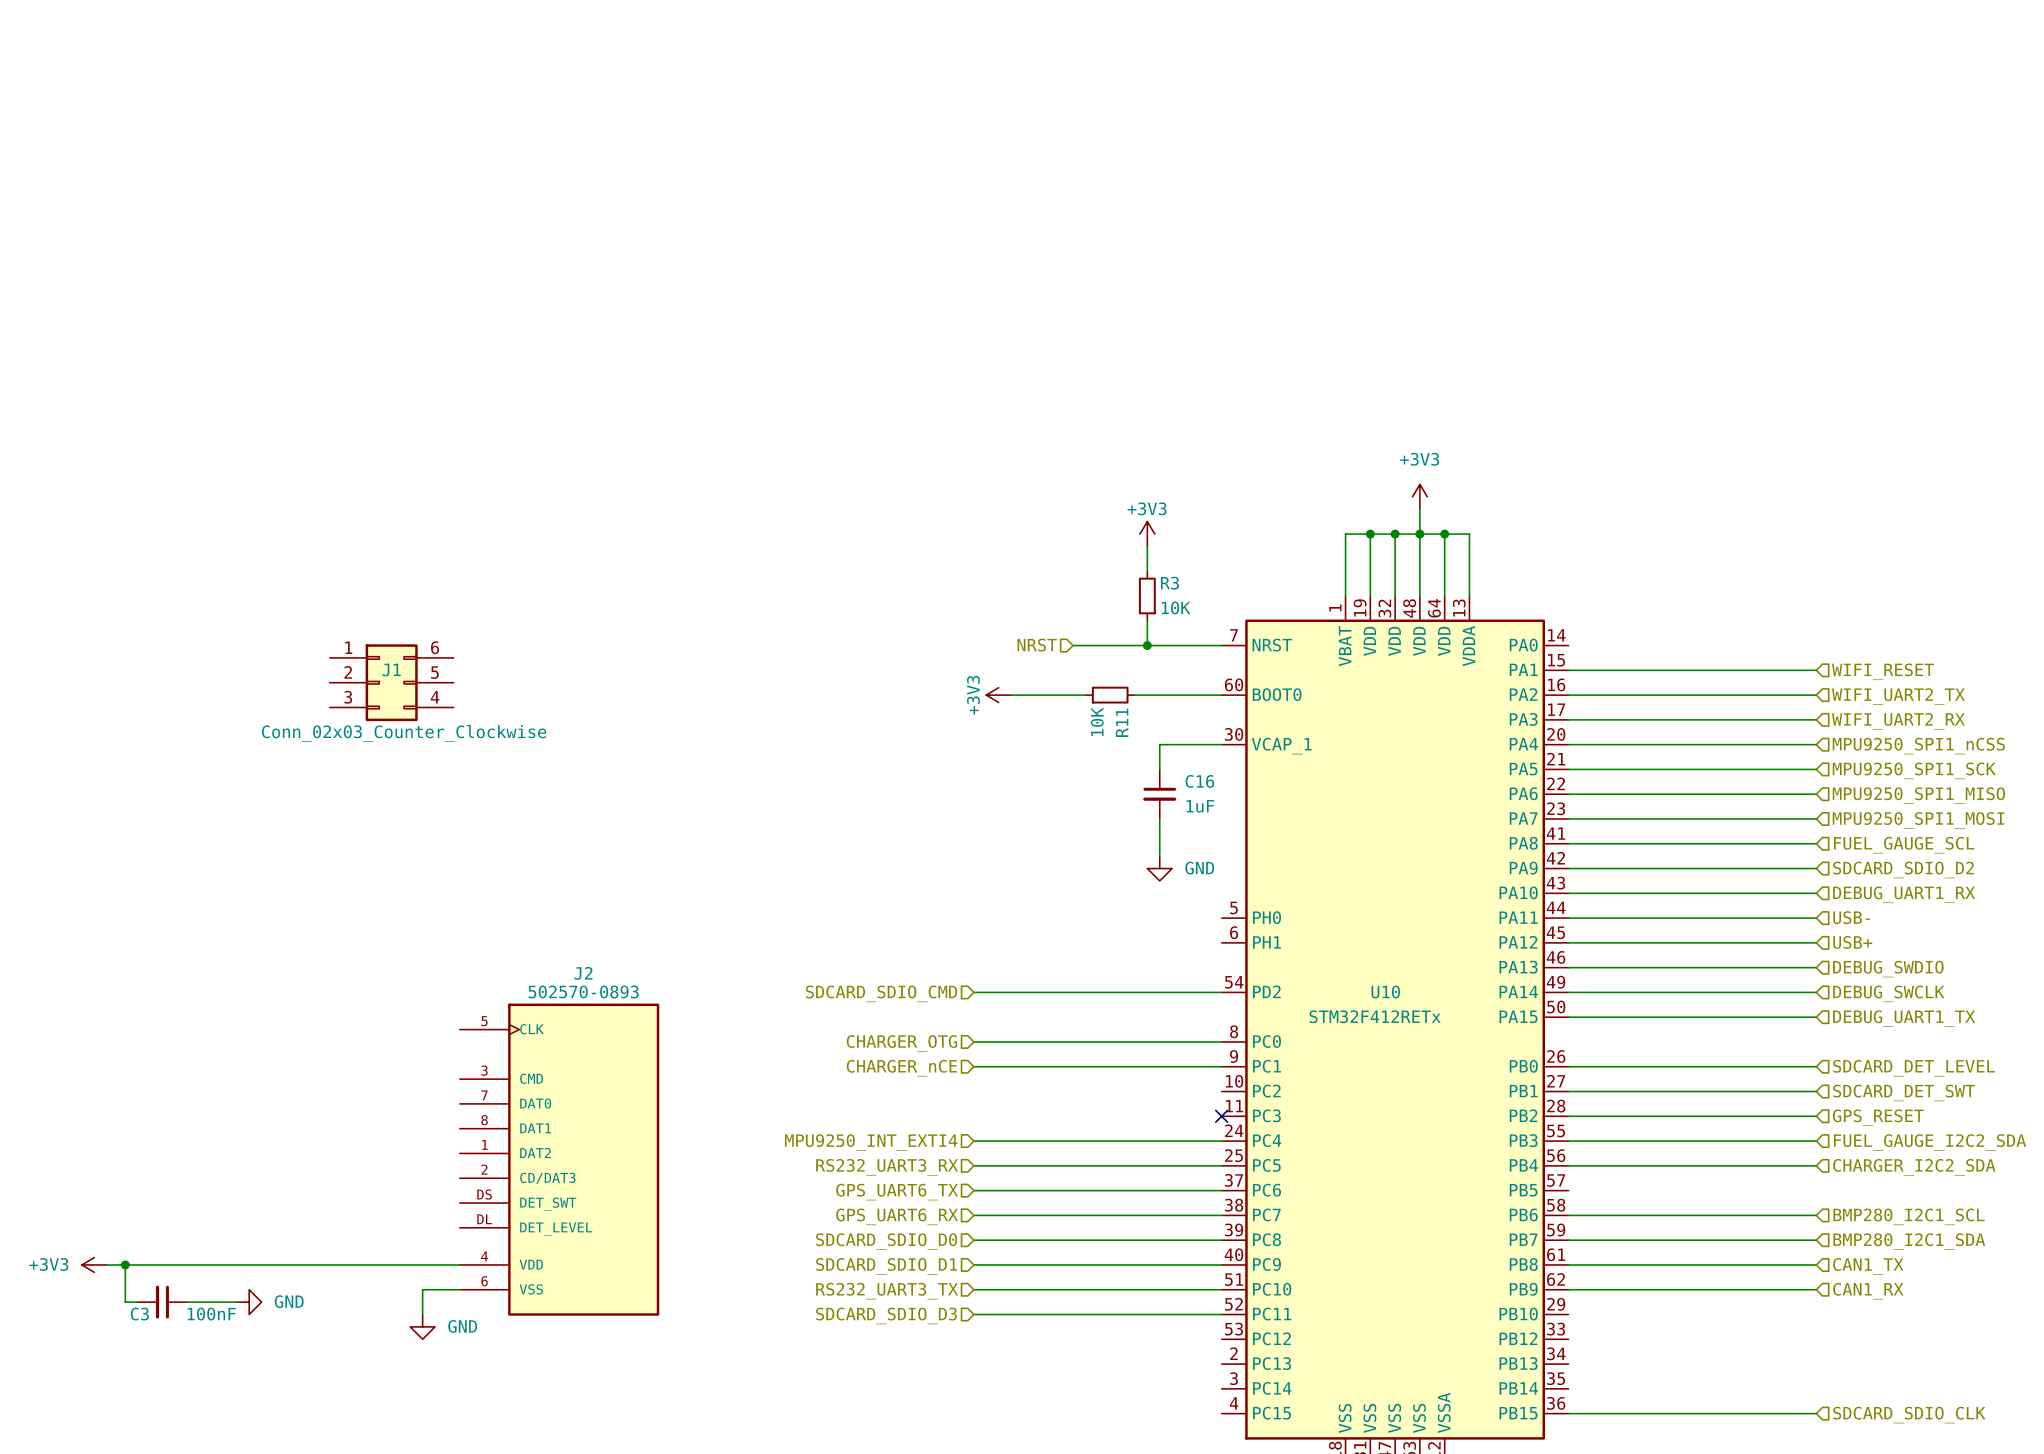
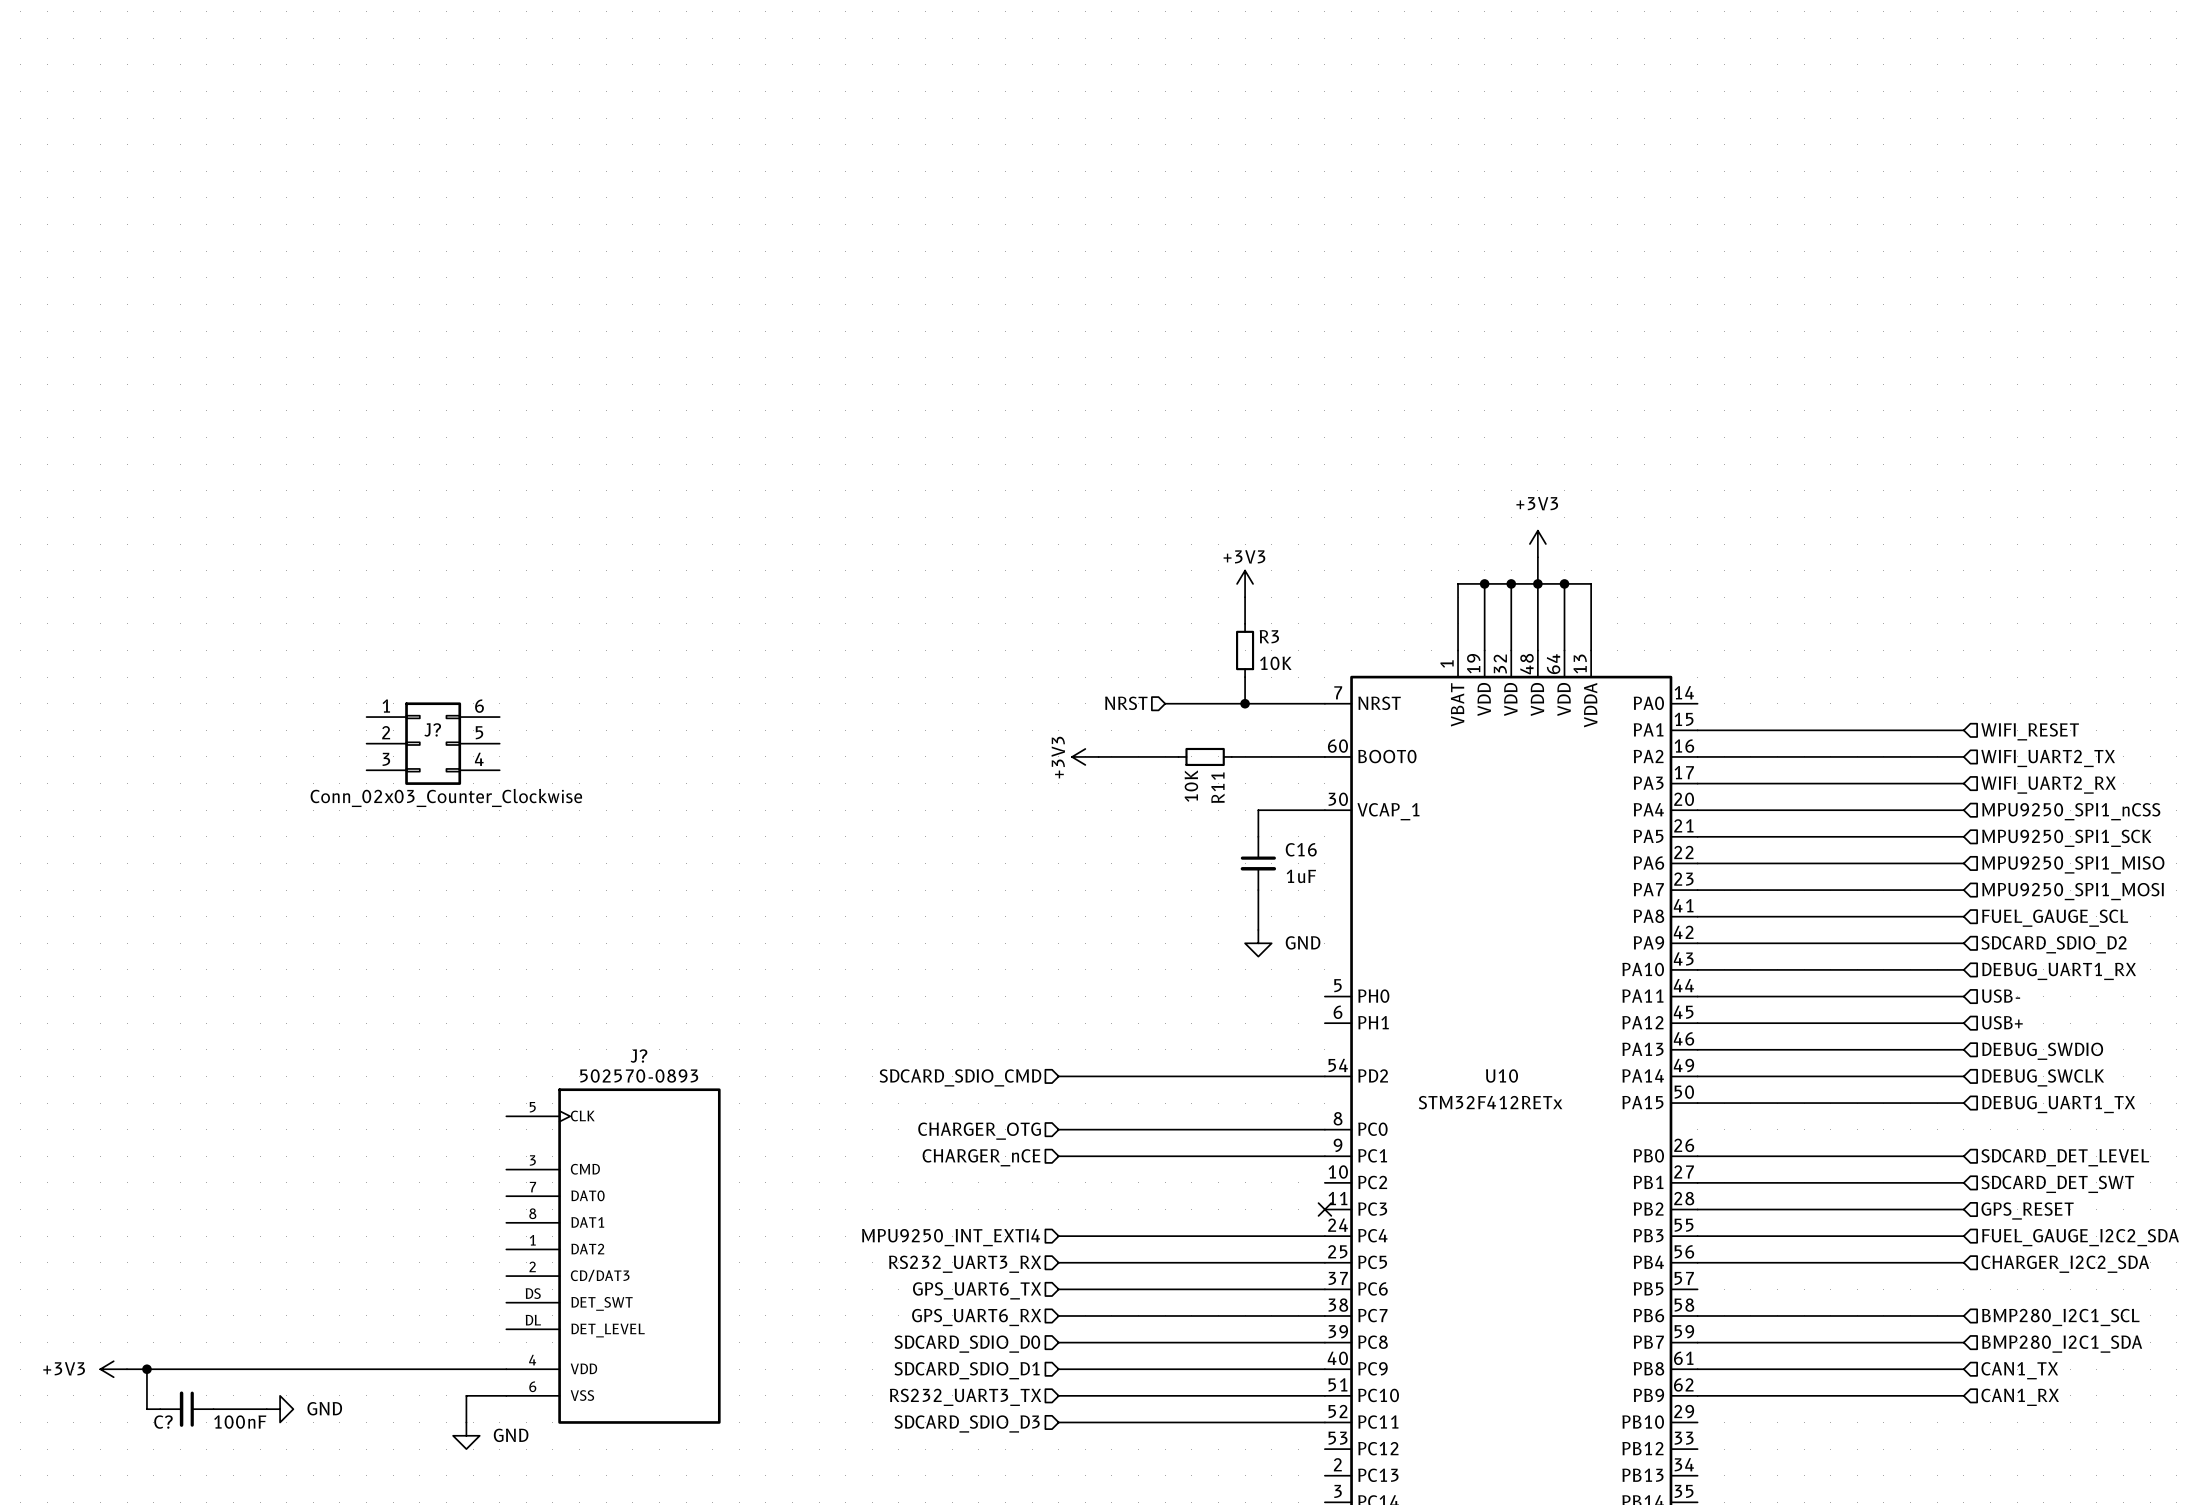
J1 name: J1 (391, 669) -> J? (432, 729)
J2 name: J2 (583, 973) -> J? (639, 1056)
C3 name: C3 (139, 1314) -> C? (163, 1422)

